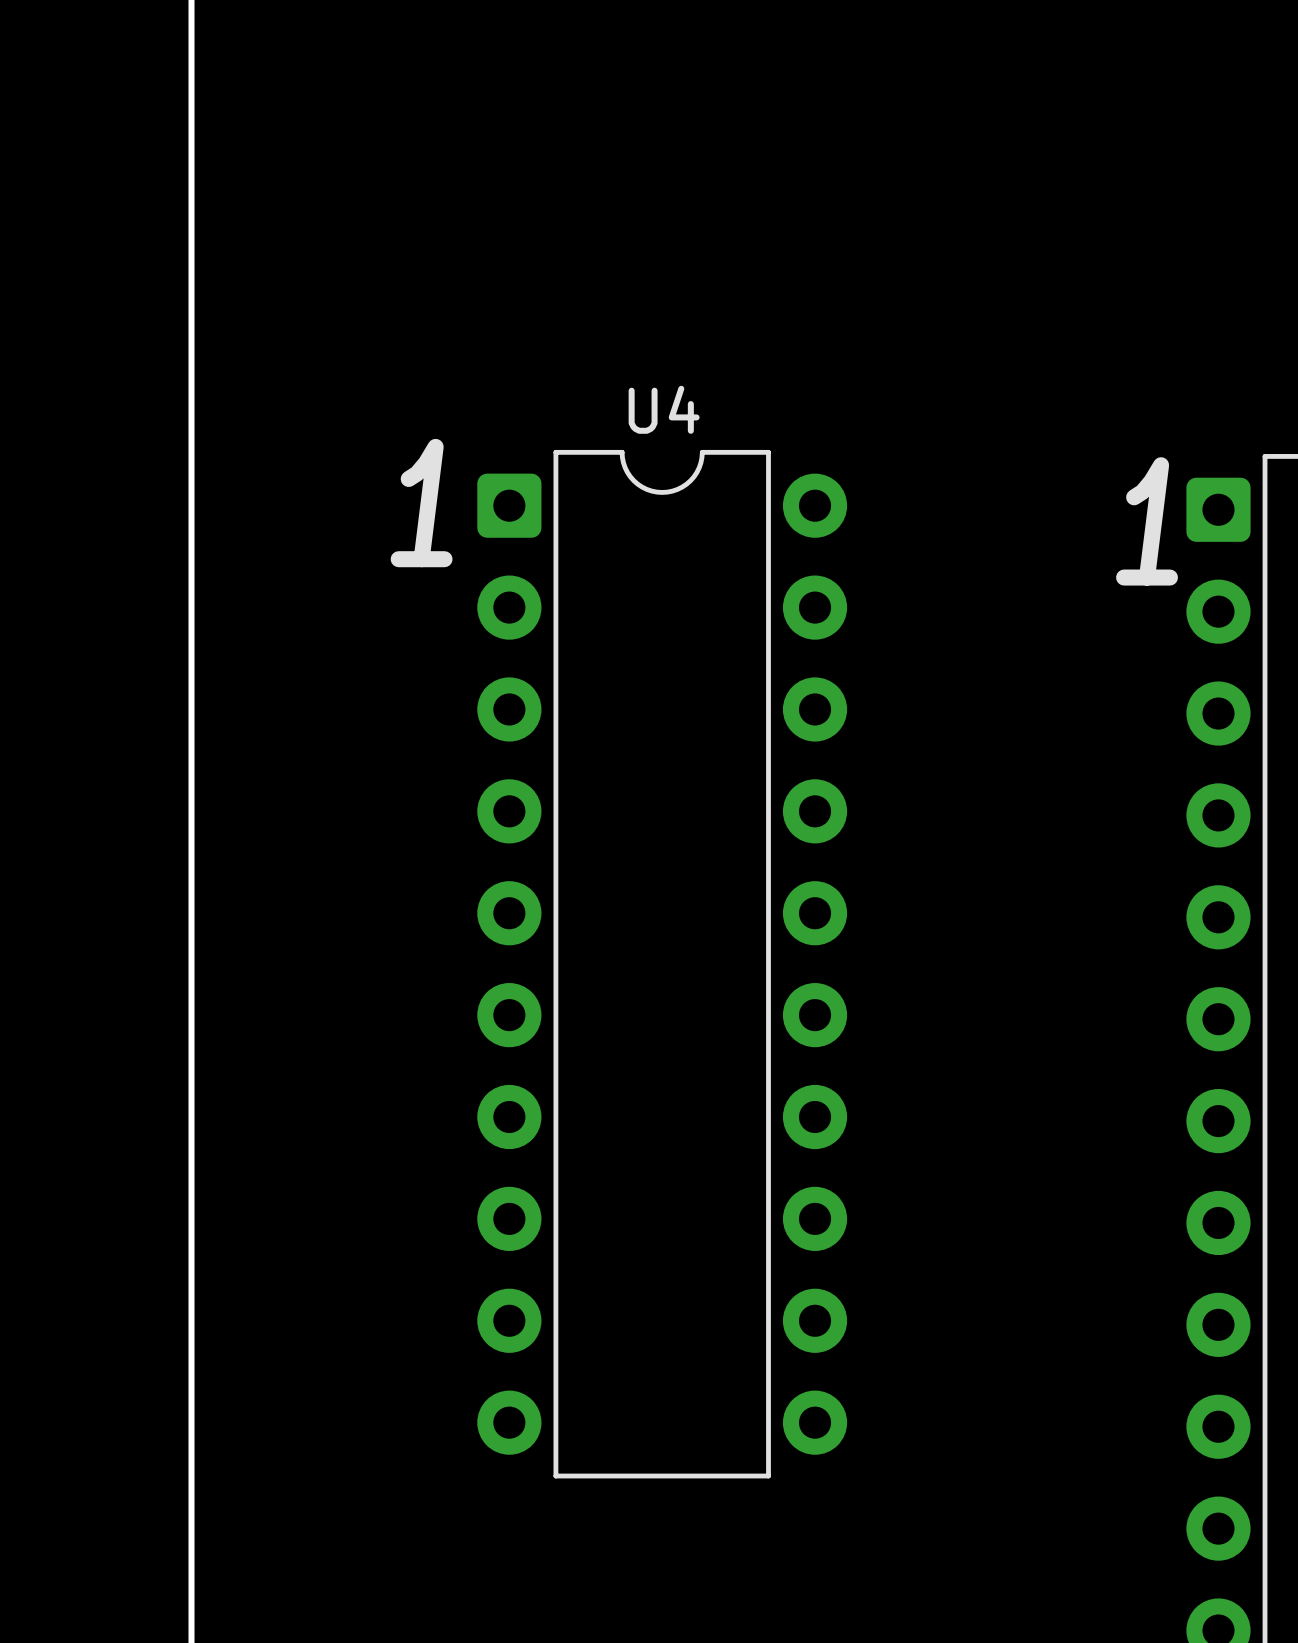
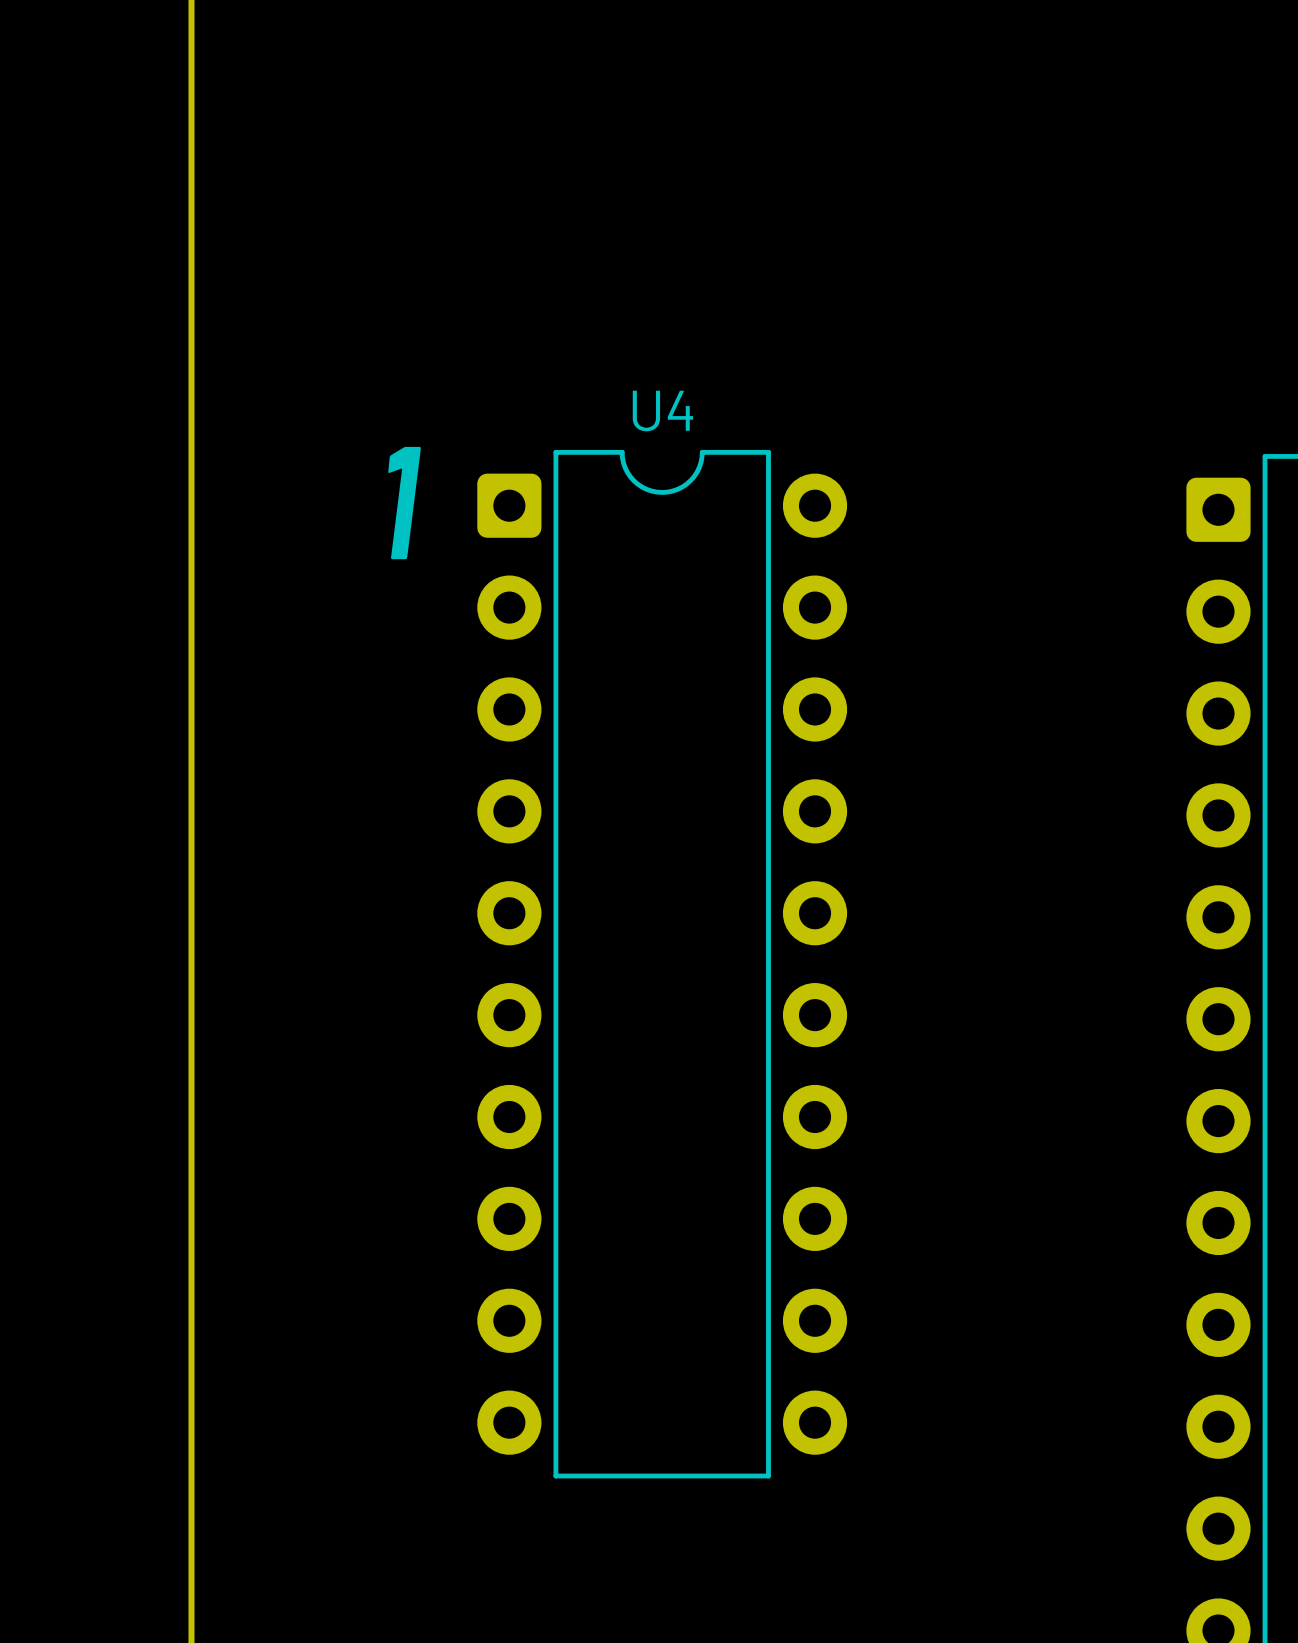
text: 1 (1147, 521) -> none

